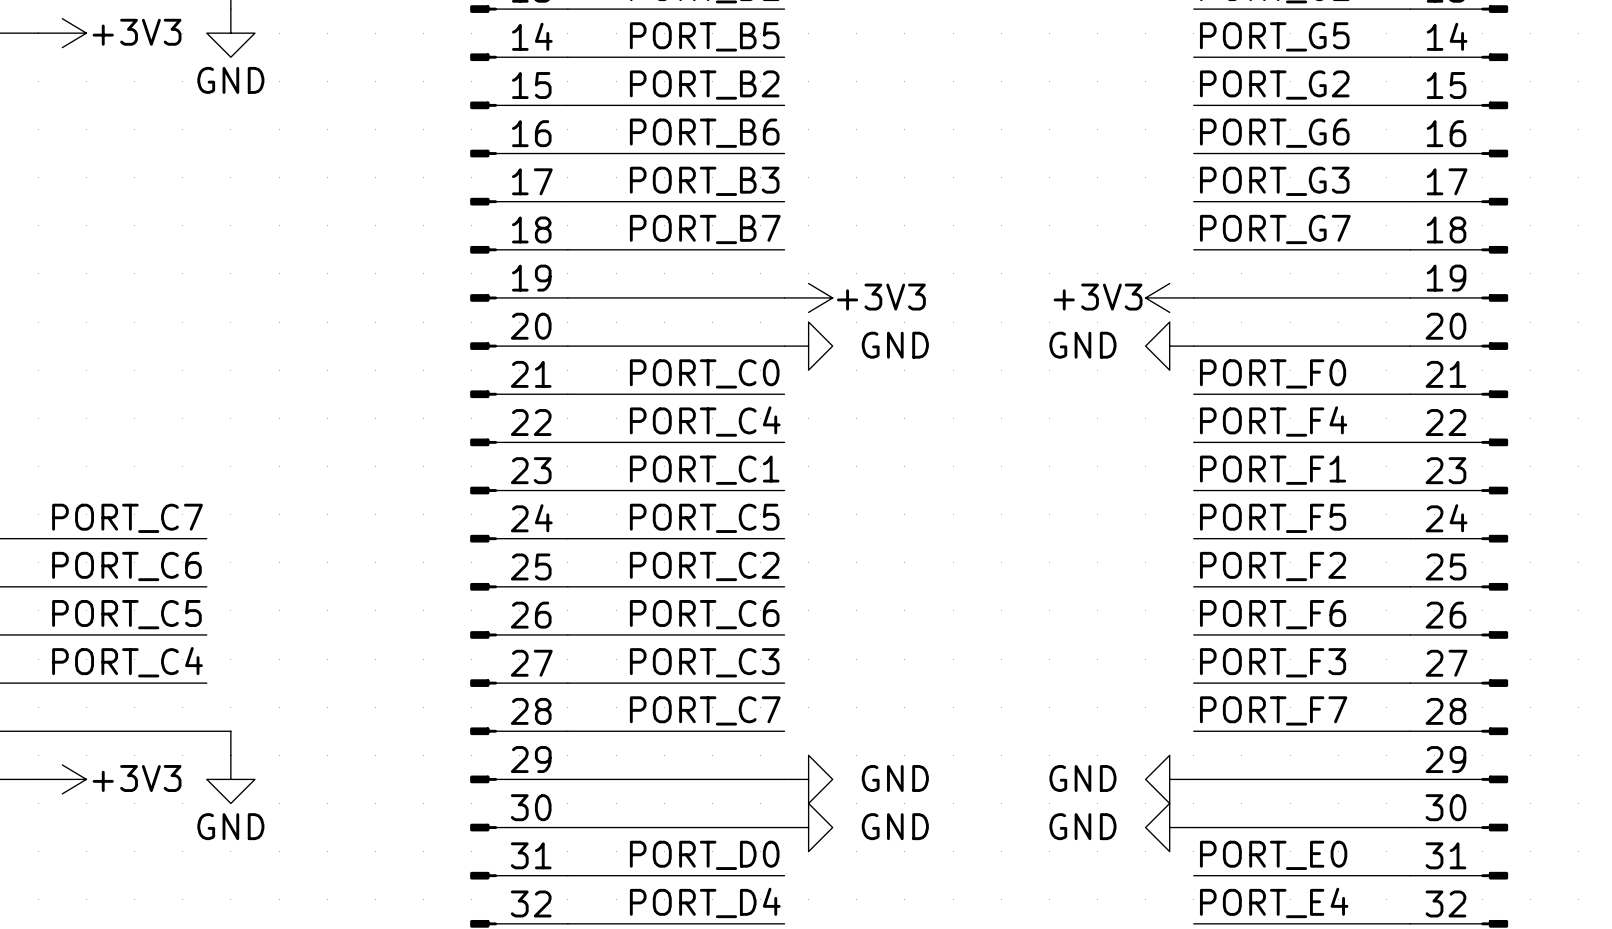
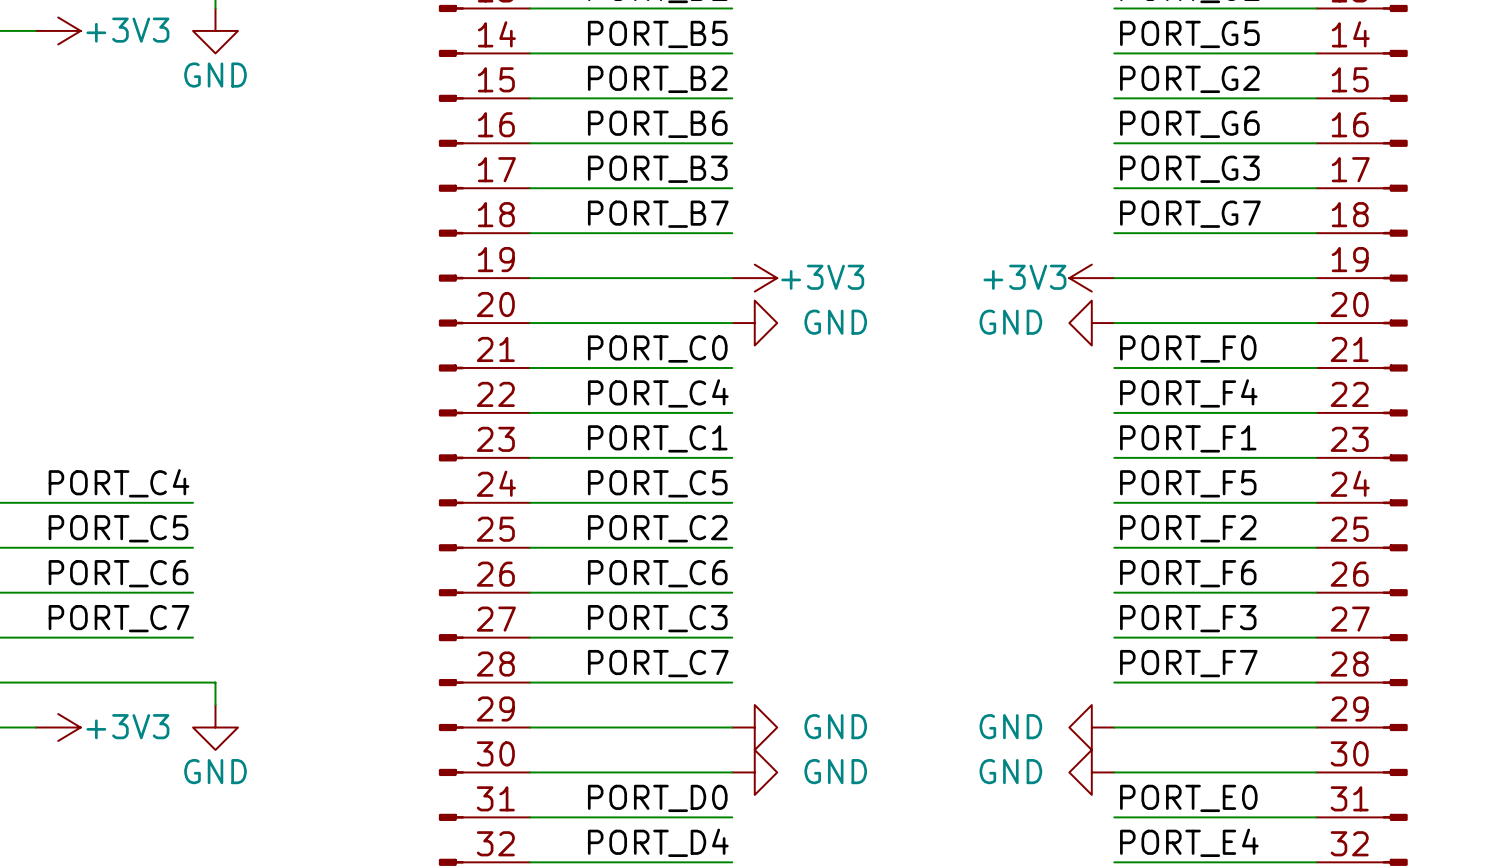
label: PORT_C7 (127, 518) -> PORT_C4 (119, 483)
label: PORT_C6 (126, 566) -> PORT_C5 (118, 528)
label: PORT_C5 (126, 614) -> PORT_C6 (118, 573)
label: PORT_C4 (127, 662) -> PORT_C7 (119, 618)

